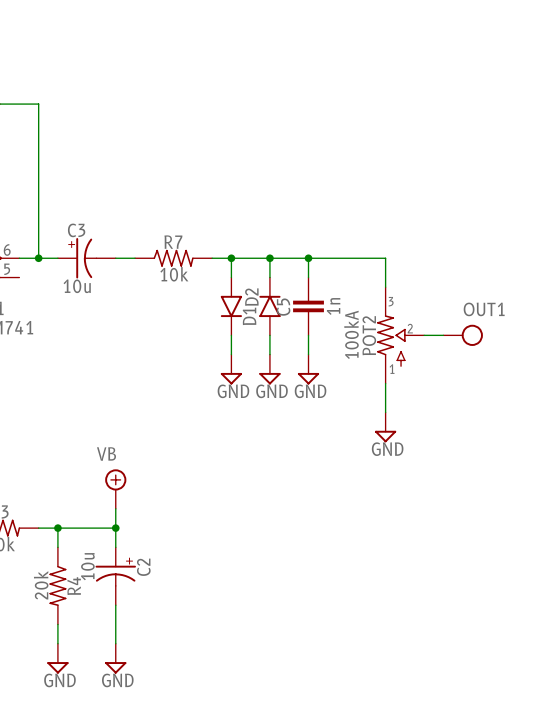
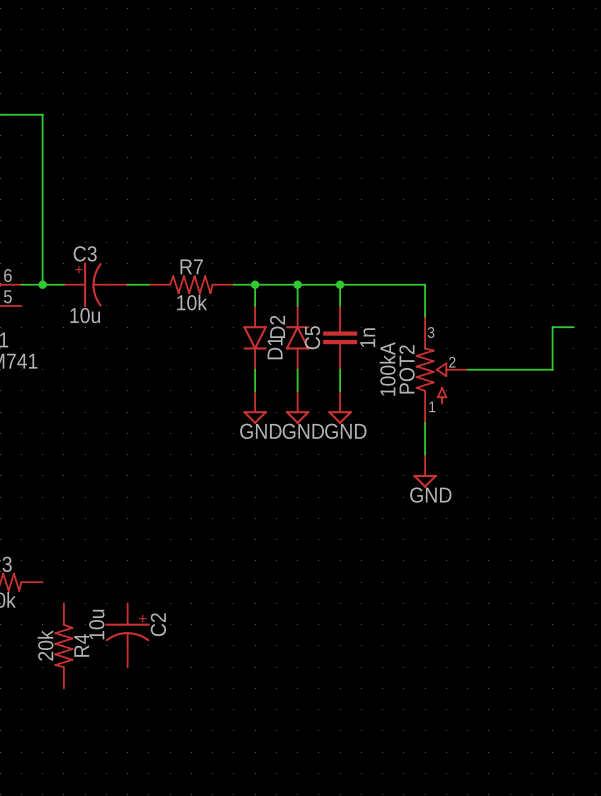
wire: none -> (573, 327) (552, 327) (552, 369) (488, 369)
OUT1: (463, 335) -> none
power symbol: VB (115, 489) -> none
wire: (115, 508) (115, 547) -> none
wire: (38, 528) (115, 528) -> none
wire: (57, 528) (57, 547) -> none
junction: (57, 528) -> none
junction: (115, 528) -> none
wire: (115, 605) (115, 643) -> none
wire: (57, 624) (57, 643) -> none
power symbol: GND (57, 658) -> none
power symbol: GND (115, 658) -> none

